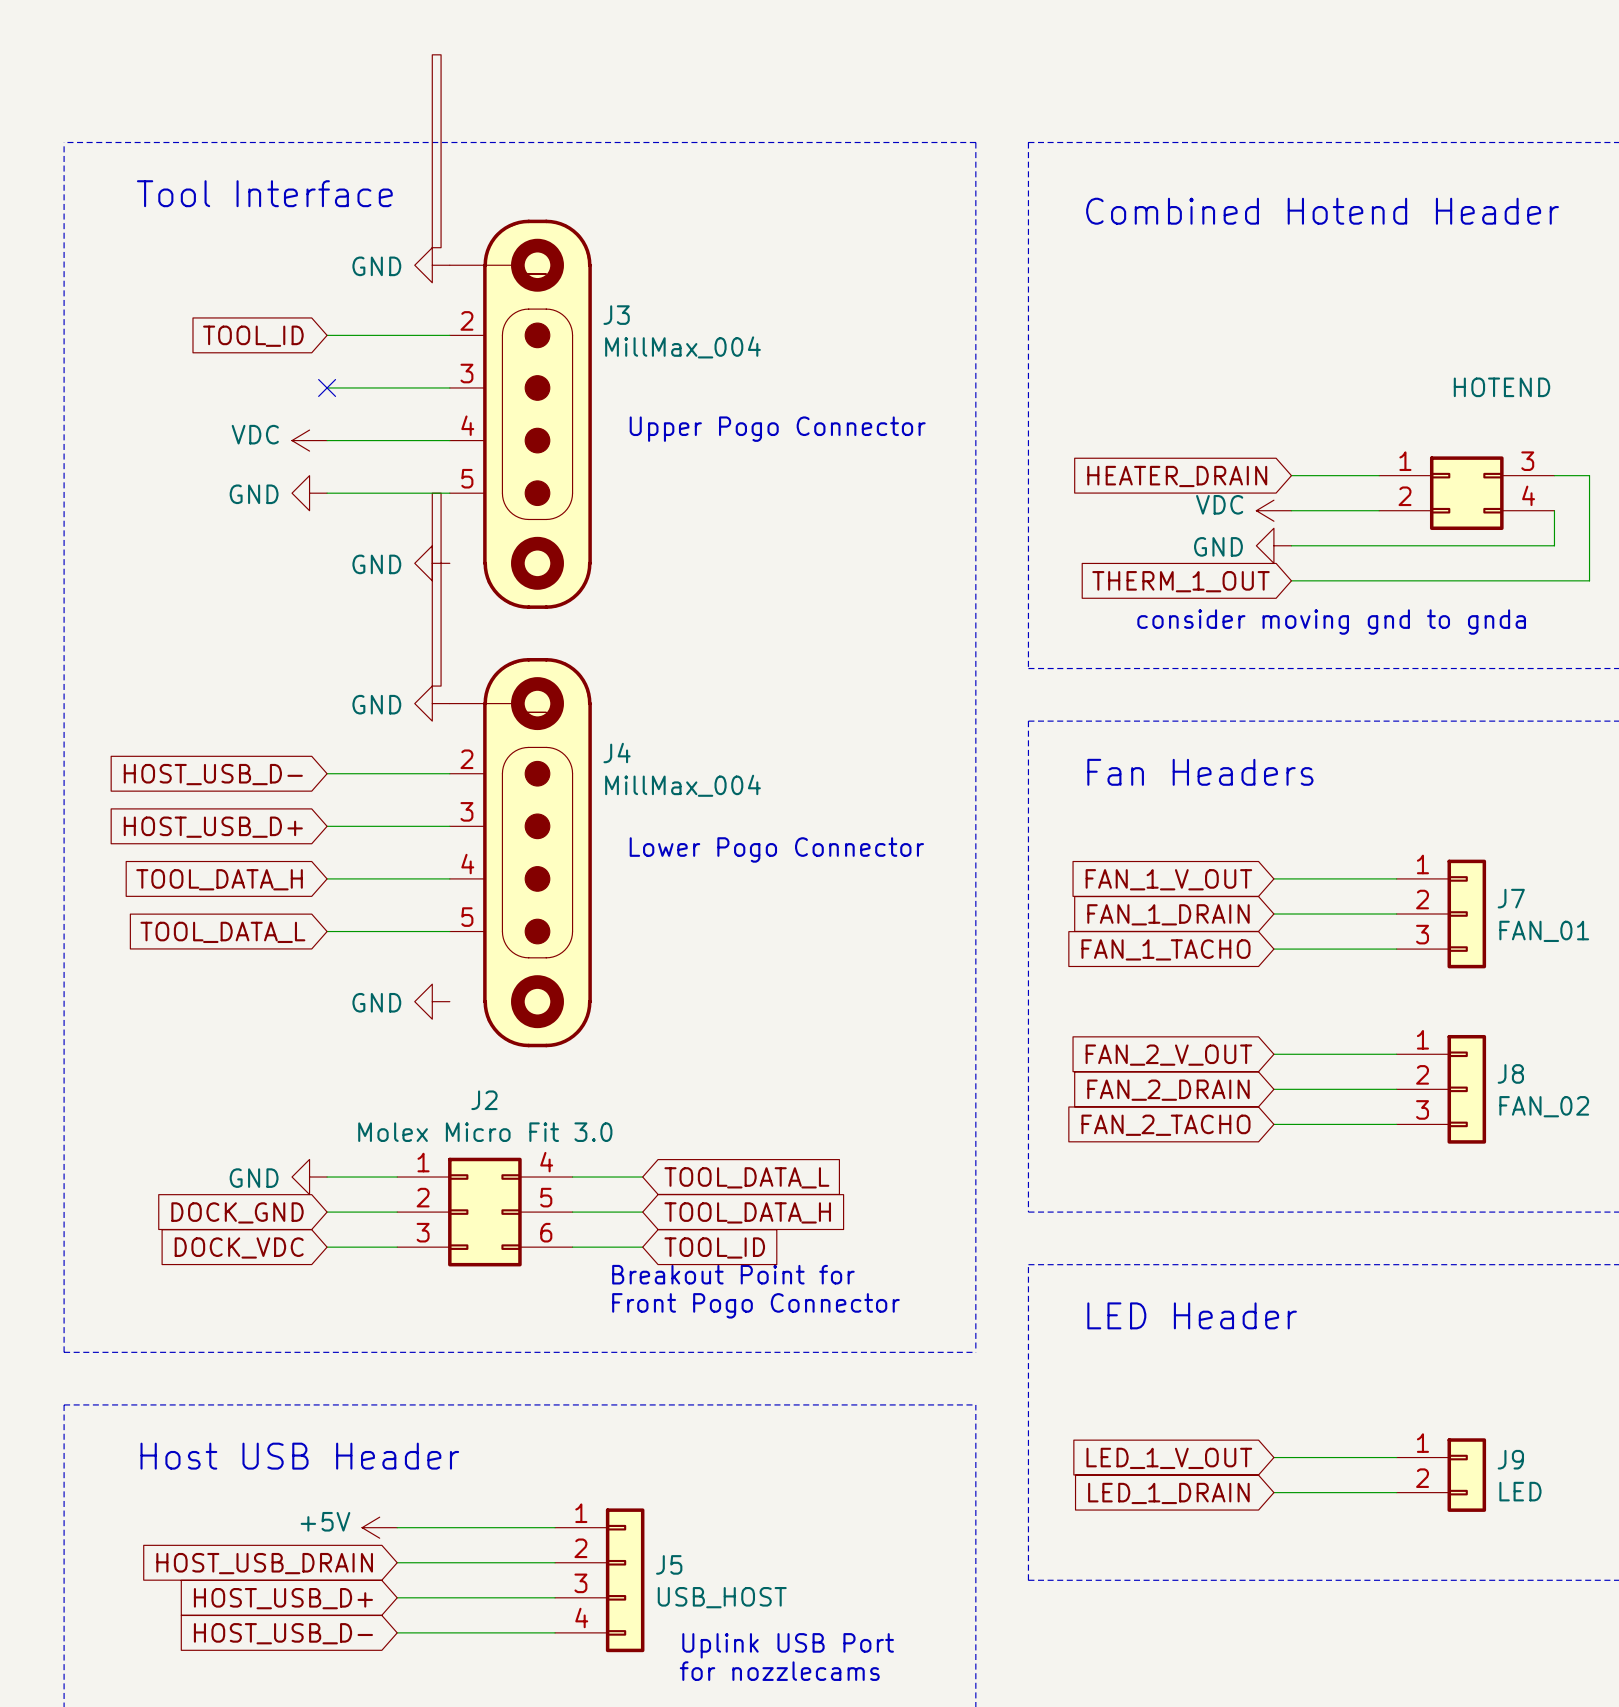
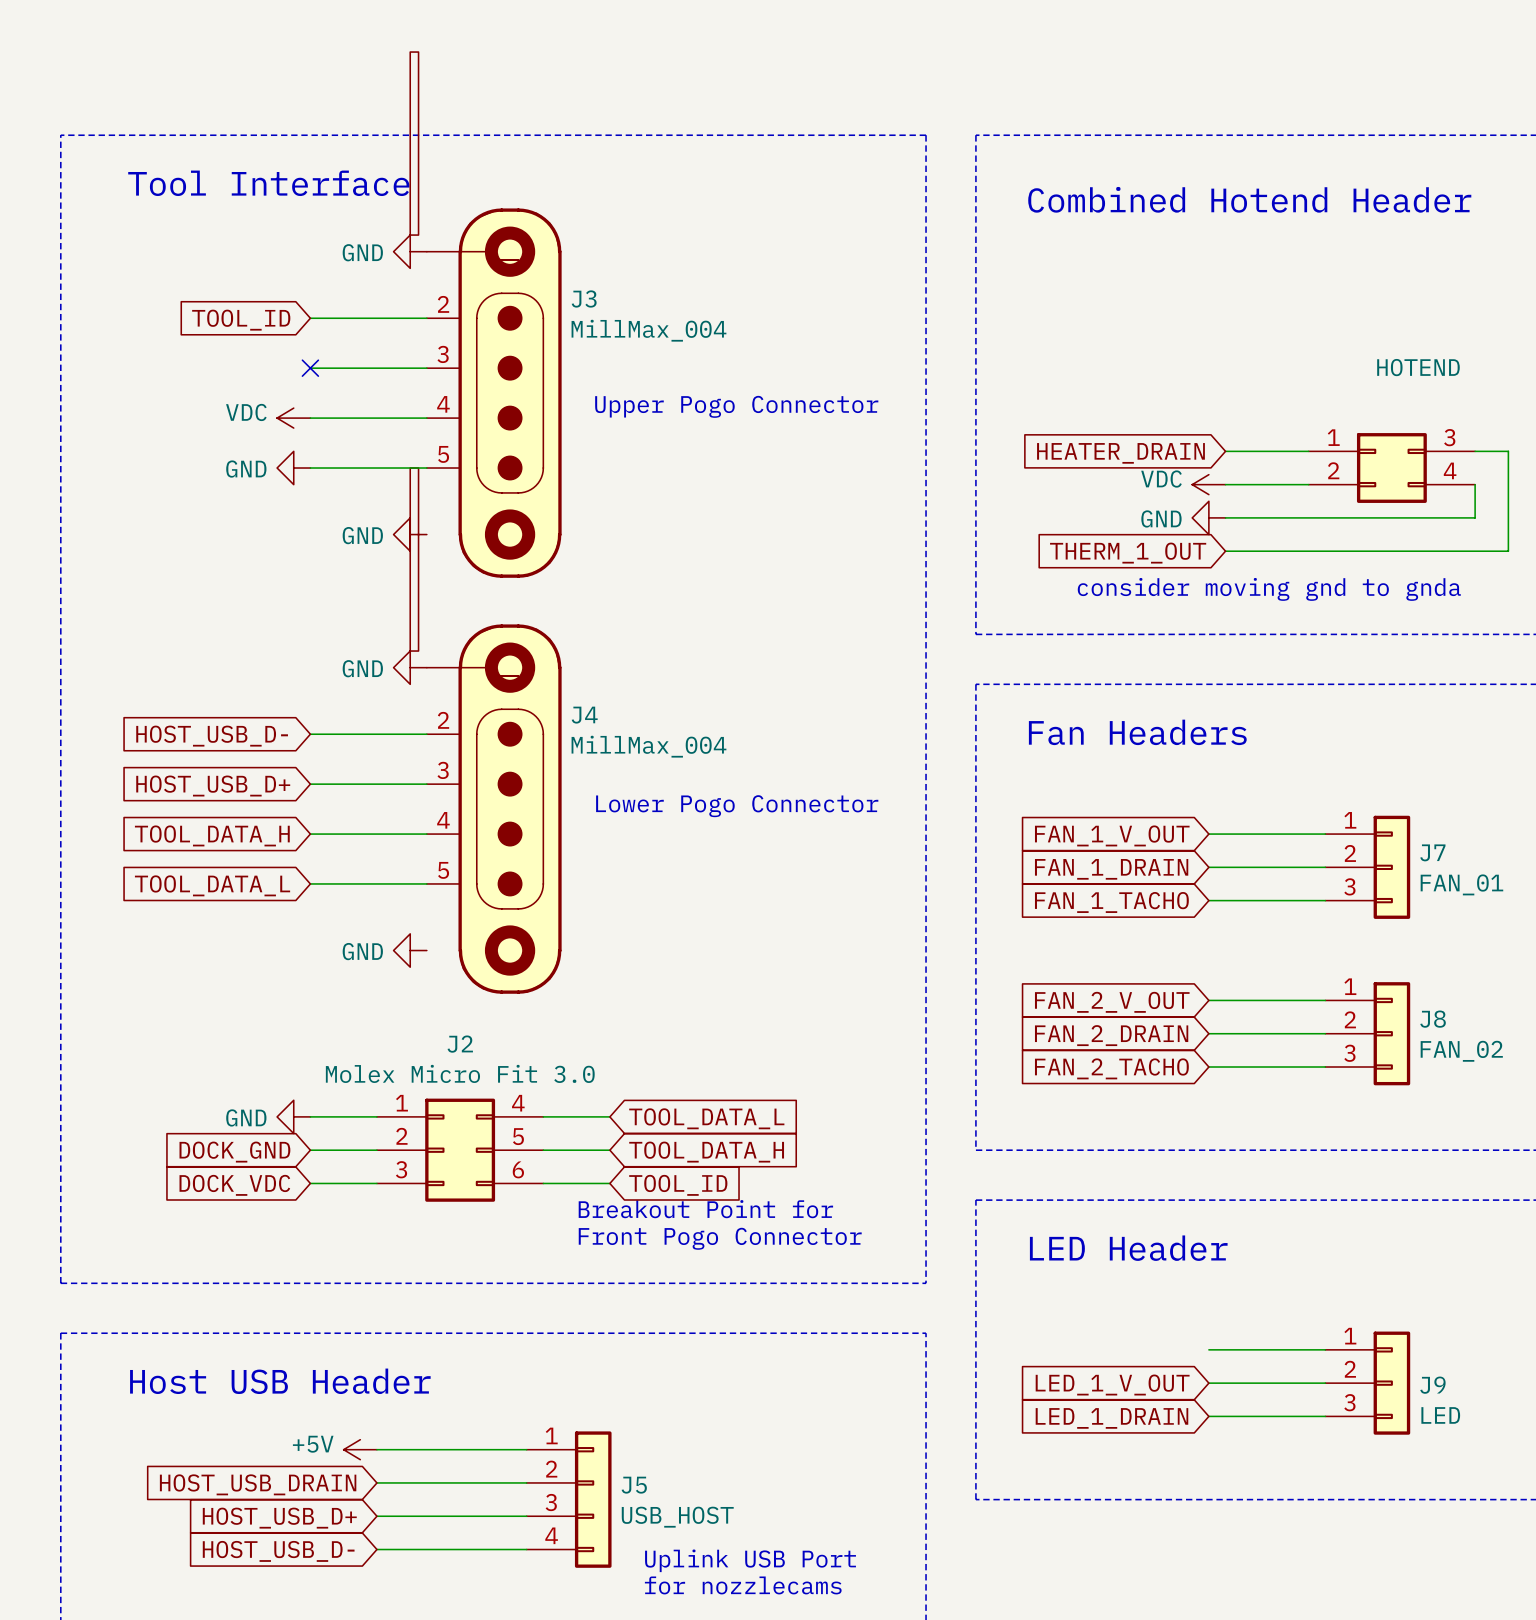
wire: none -> (1208, 1349) (1325, 1349)
J9 symbol: [1396, 1438, 1487, 1512] -> [1325, 1331, 1411, 1435]

